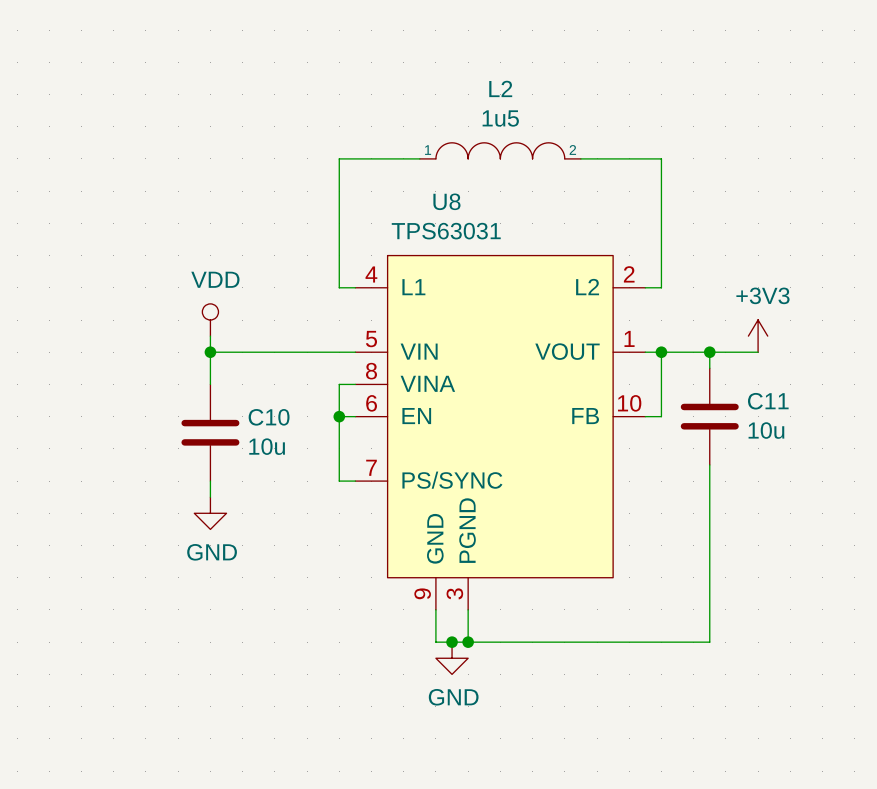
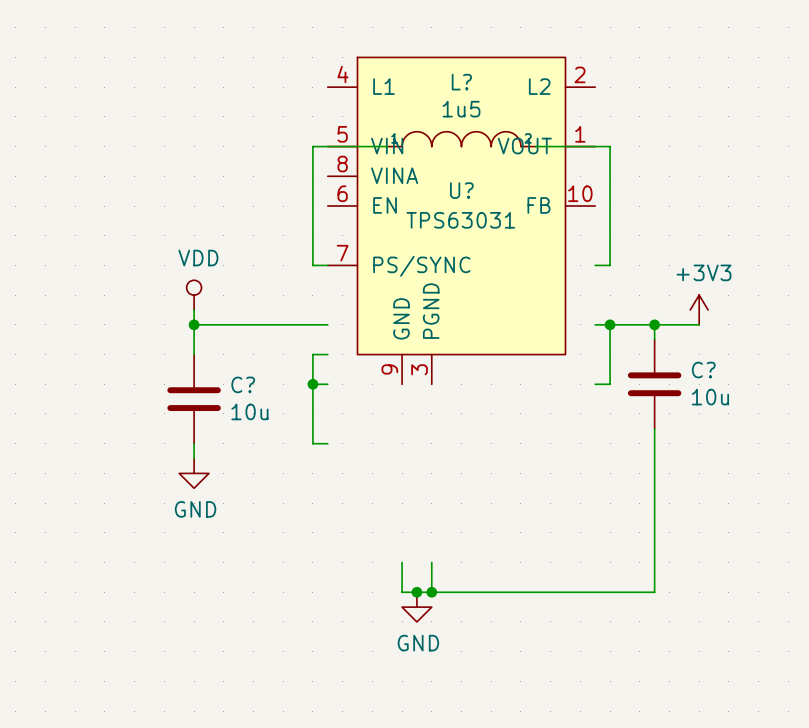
L2 name: L2 (500, 88) -> L? (461, 82)
U?: none -> TPS63031 (409, 220)
C11 name: C11 (768, 401) -> C? (703, 370)
C10 name: C10 (269, 417) -> C? (243, 384)
U8: TPS63031 (443, 432) -> none

